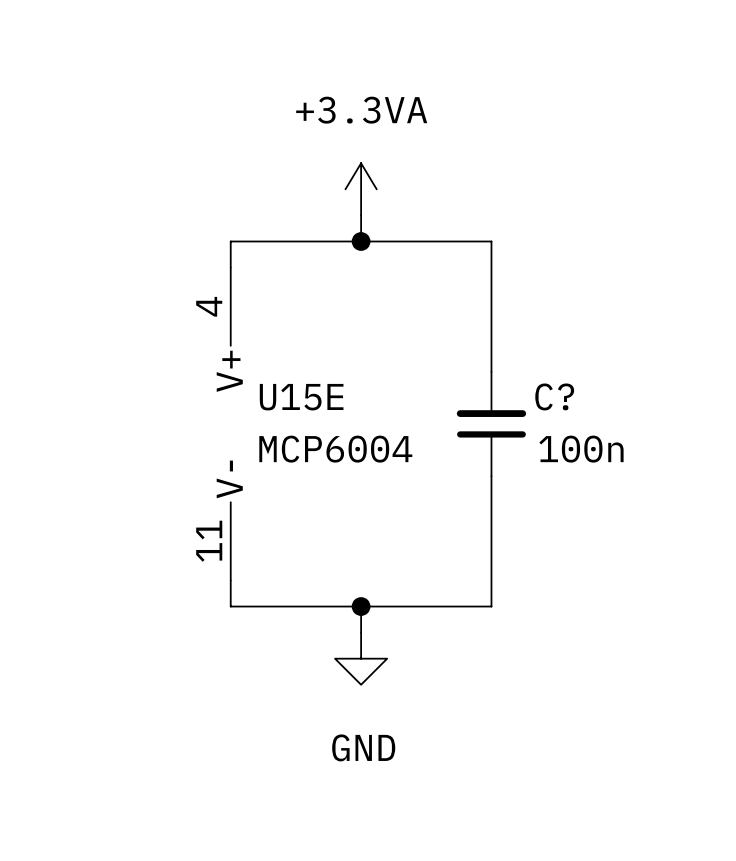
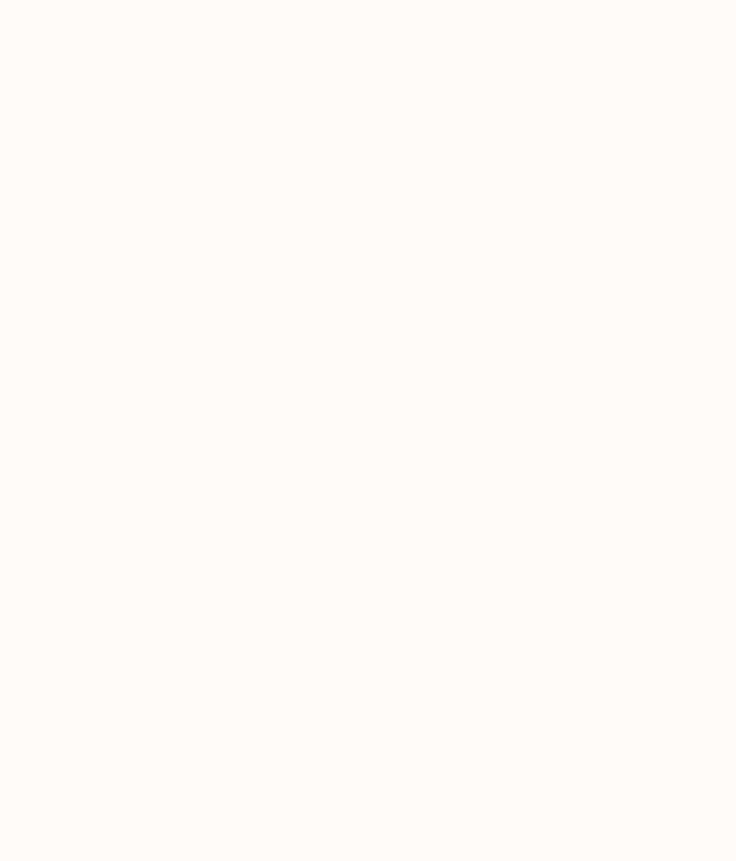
power symbol: +3.3VA (361, 189) -> none
wire: (361, 215) (361, 241) -> none
junction: (361, 241) -> none
wire: (230, 267) (230, 241) (491, 241) (491, 371) -> none
U15E: MCP6004 (230, 424) -> none
C?: 100n (491, 424) -> none
wire: (491, 476) (491, 606) (230, 606) (230, 580) -> none
wire: (361, 606) (361, 632) -> none
junction: (361, 606) -> none
power symbol: GND (361, 658) -> none

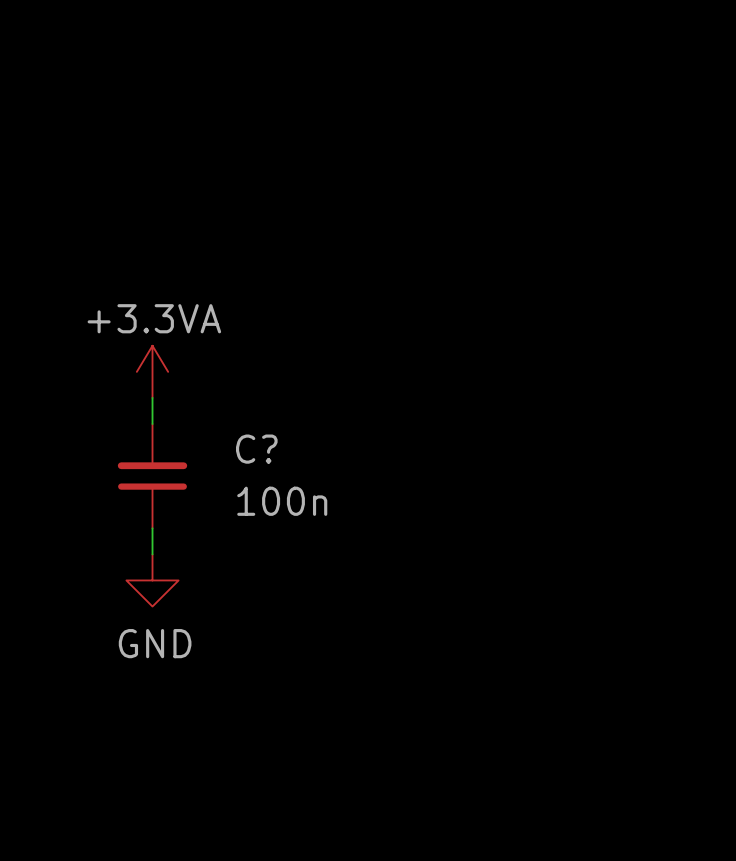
power symbol: none -> +3.3VA (152, 371)
wire: none -> (152, 397) (152, 424)
C?: none -> 100n (152, 476)
wire: none -> (152, 528) (152, 554)
power symbol: none -> GND (152, 580)

